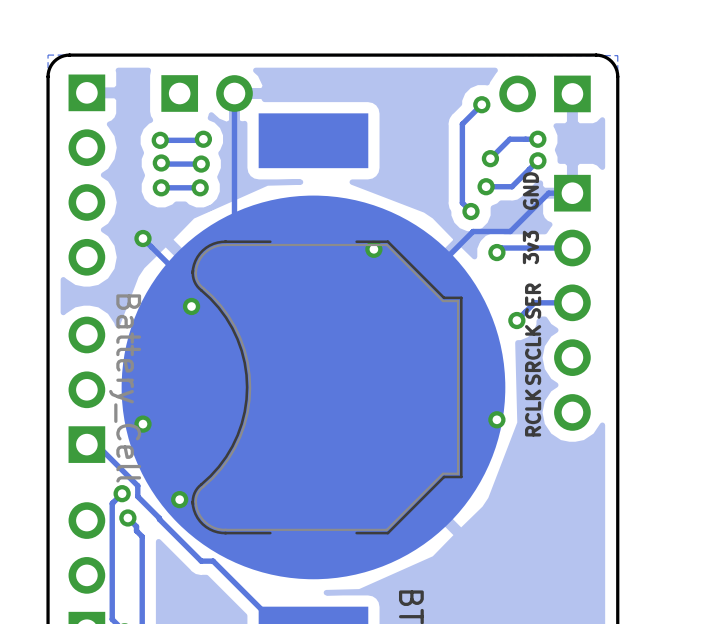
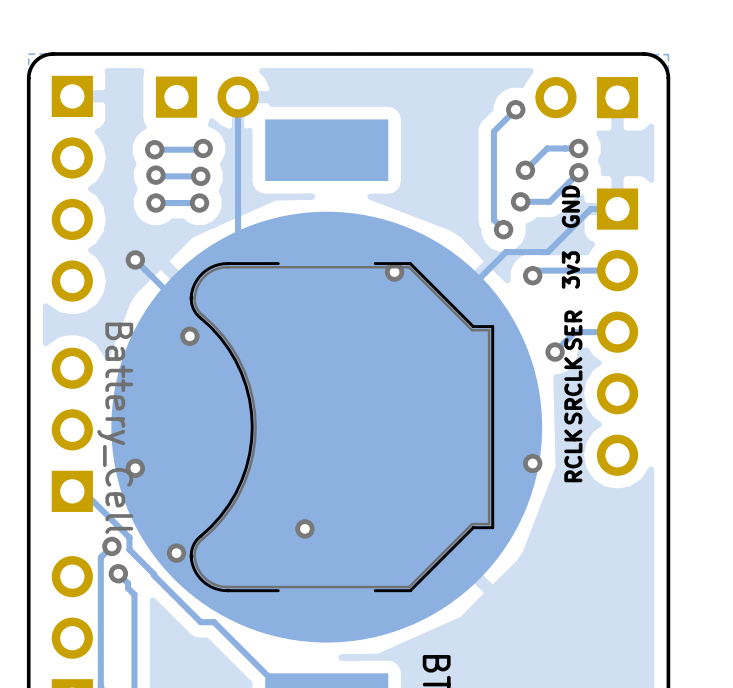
via: none -> (304, 528)

